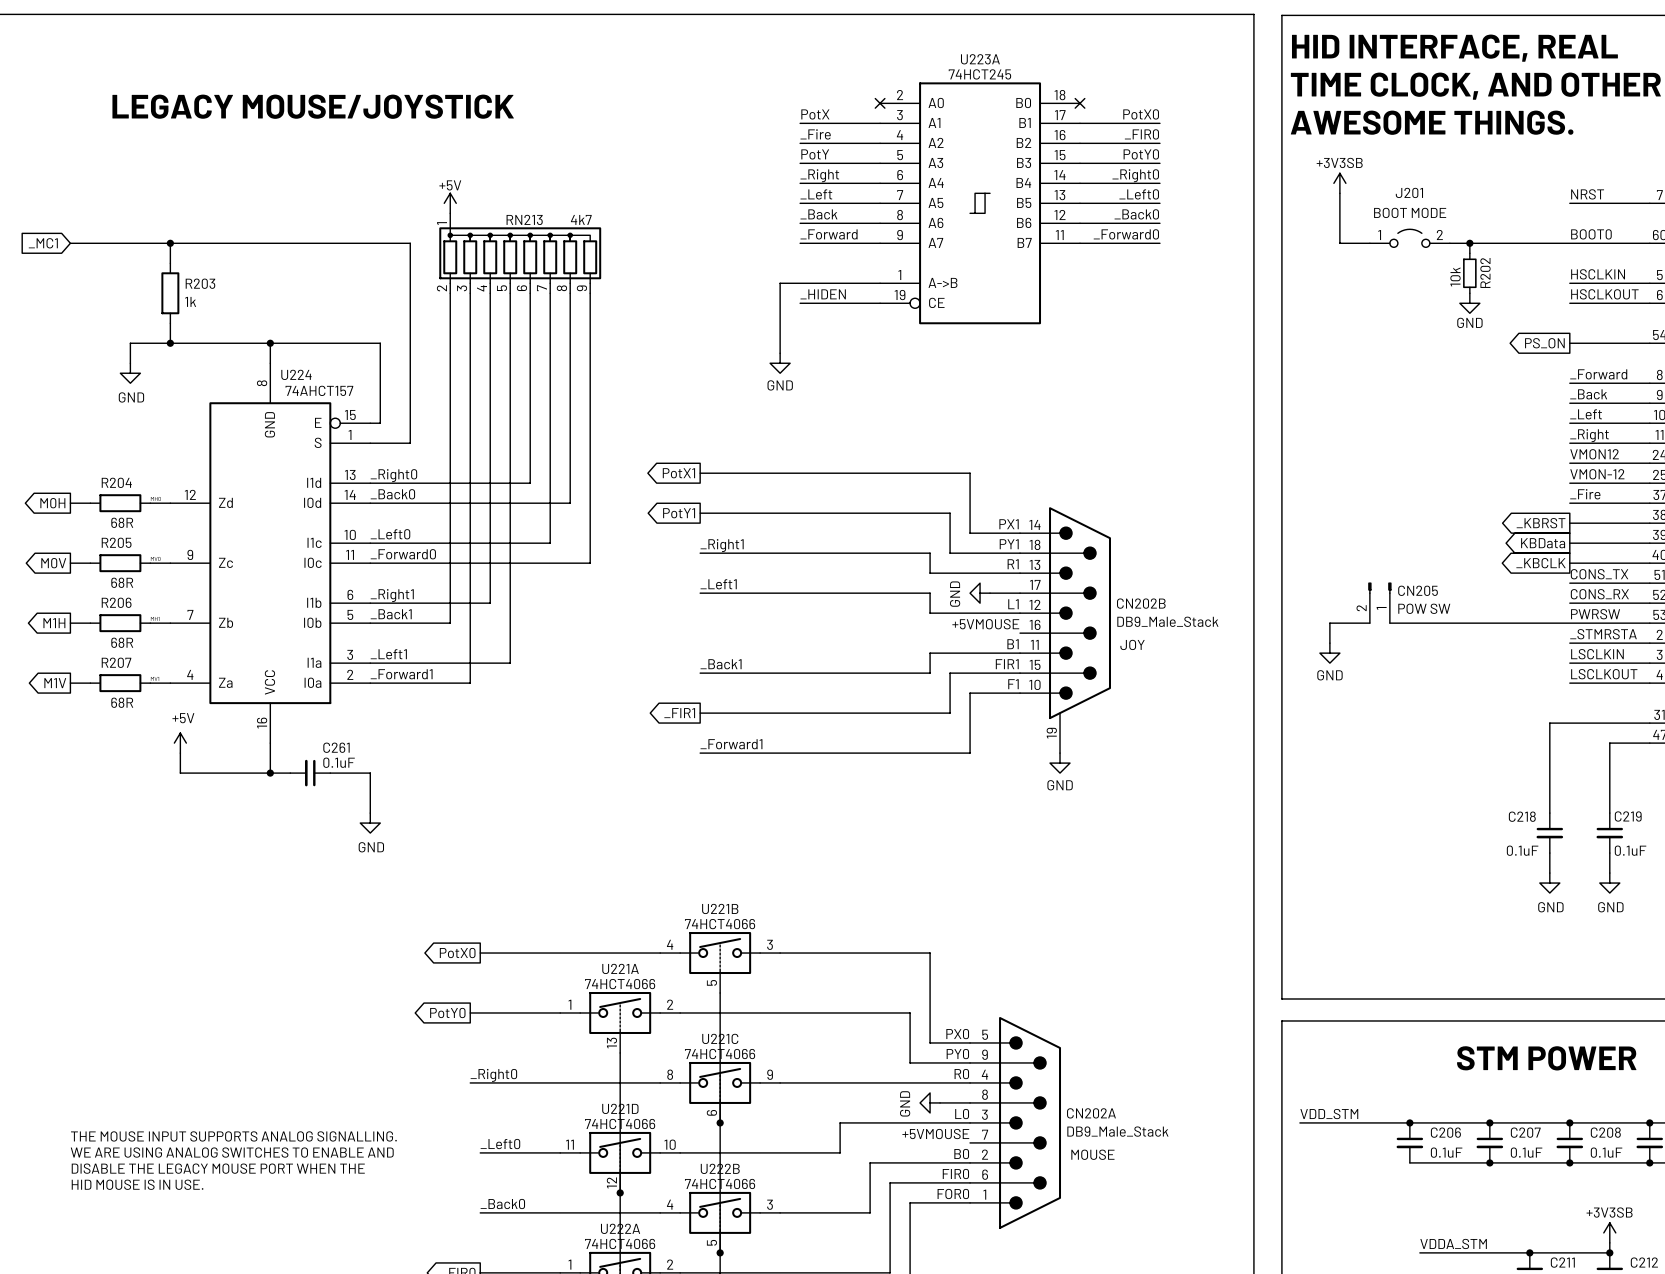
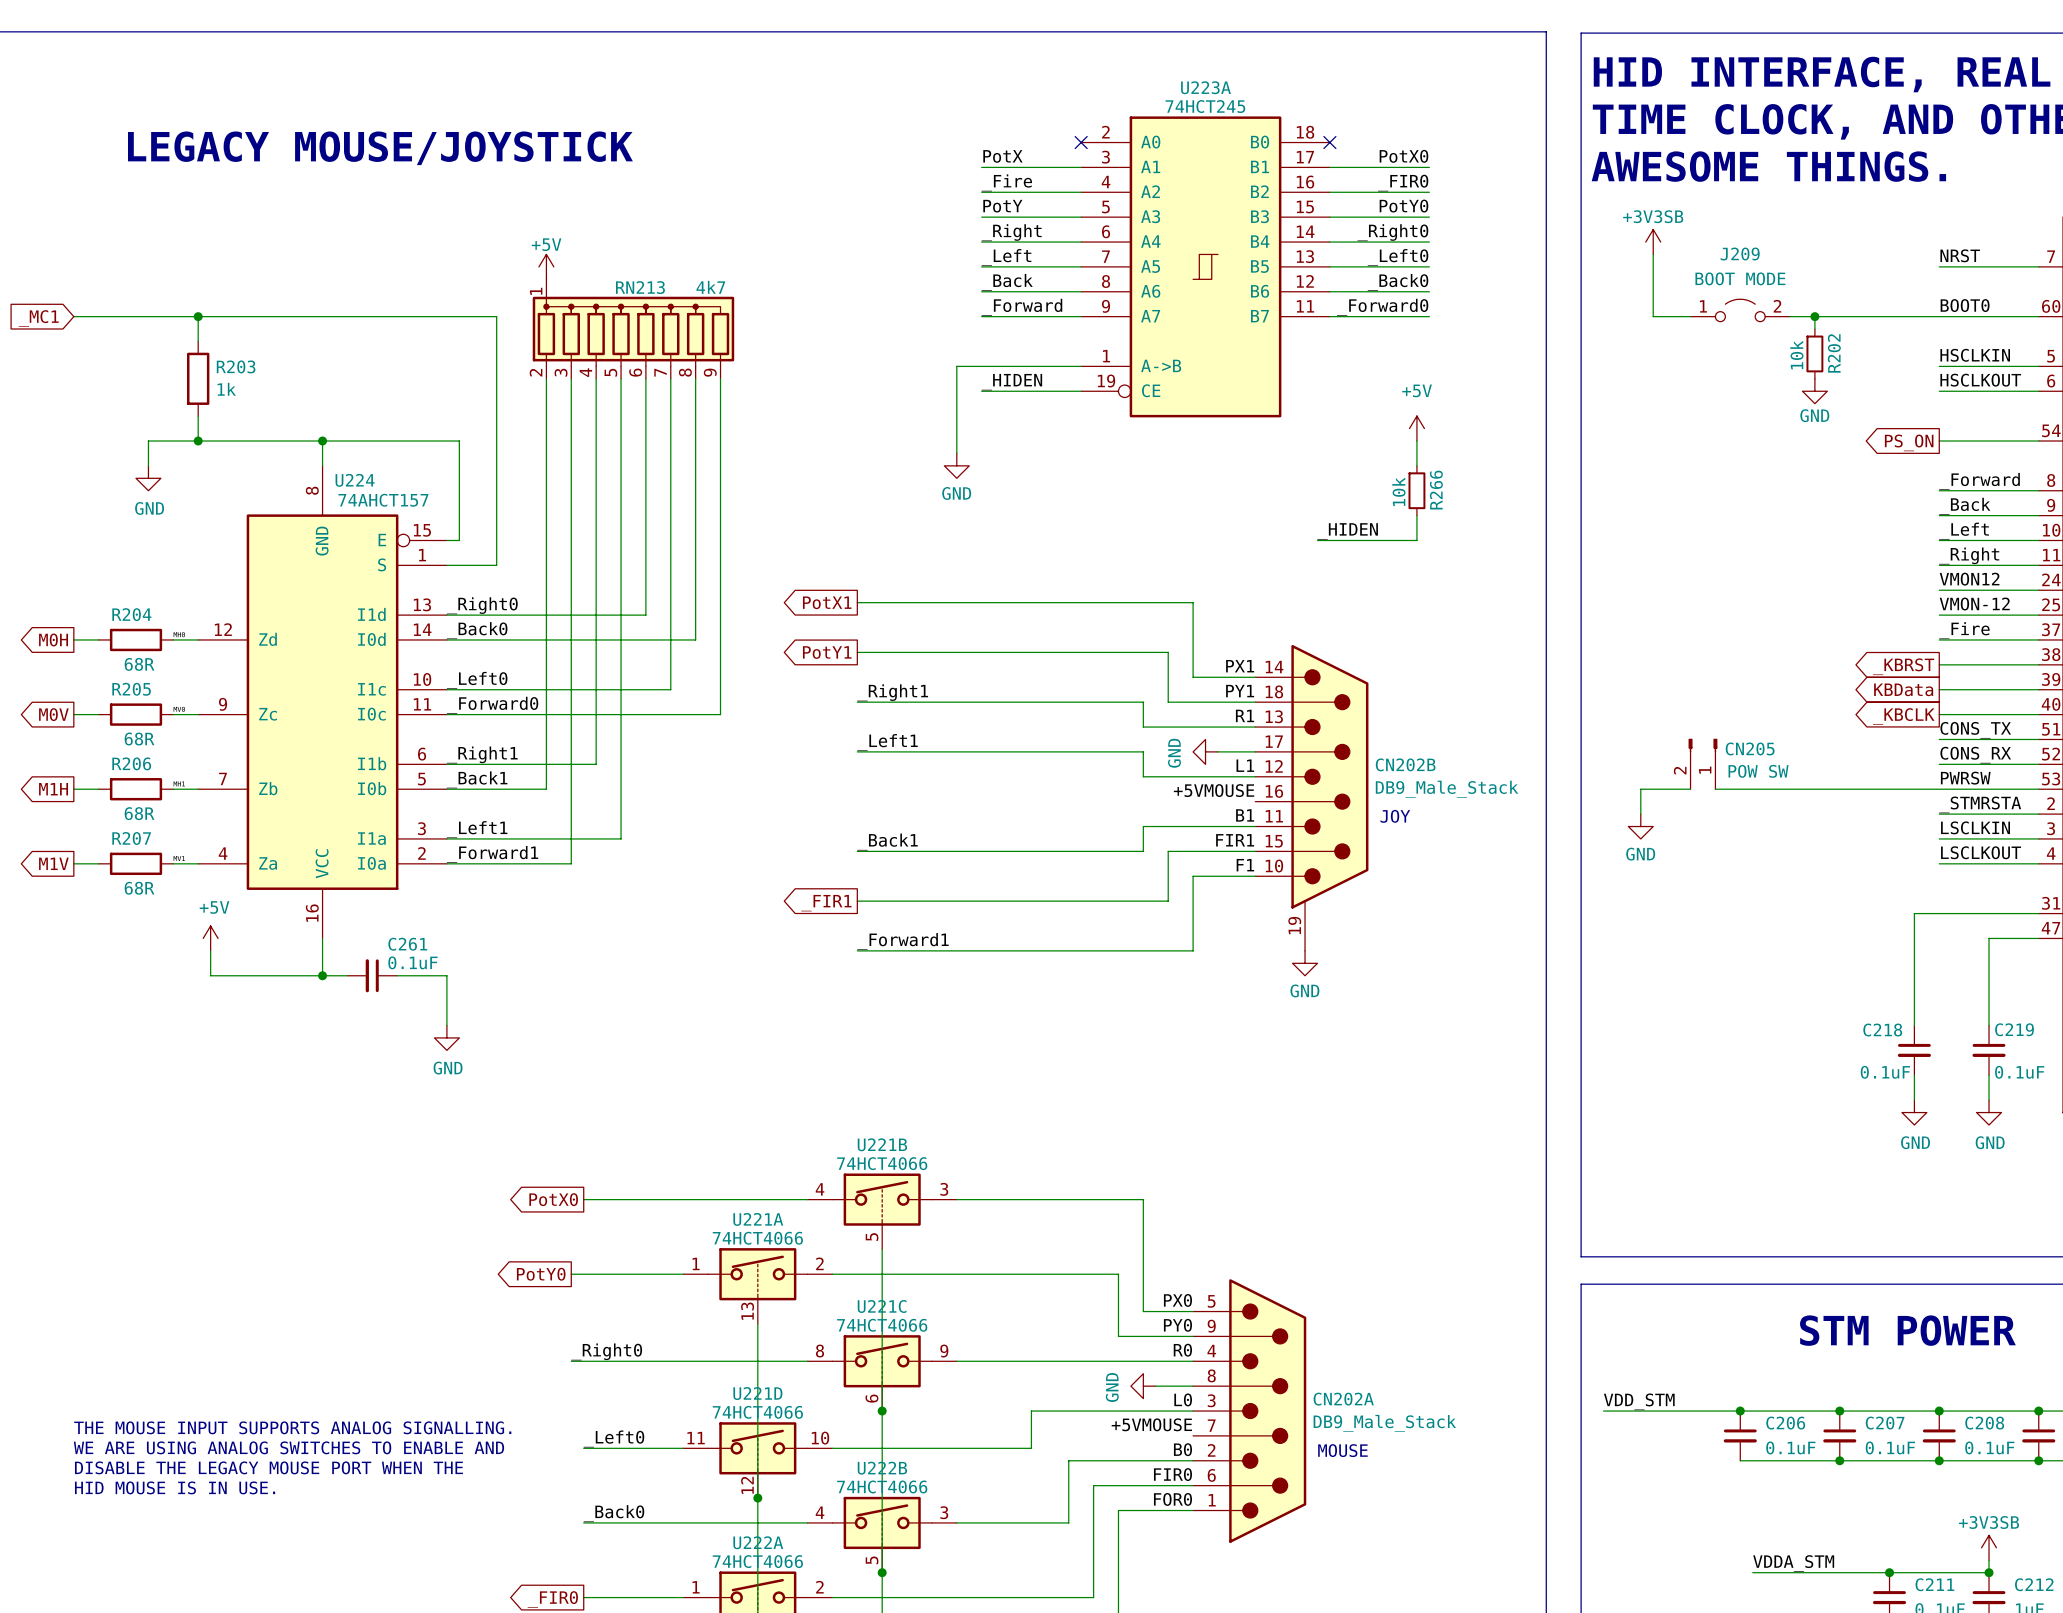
J201 name: J201 (1409, 192) -> J209 (1740, 254)
power symbol: none -> +5V (1416, 428)
wire: none -> (1416, 441) (1416, 465)
R266: none -> 10k (1416, 490)
wire: none -> (1416, 515) (1416, 540) (1317, 540)
label: none -> _HIDEN (1347, 531)

